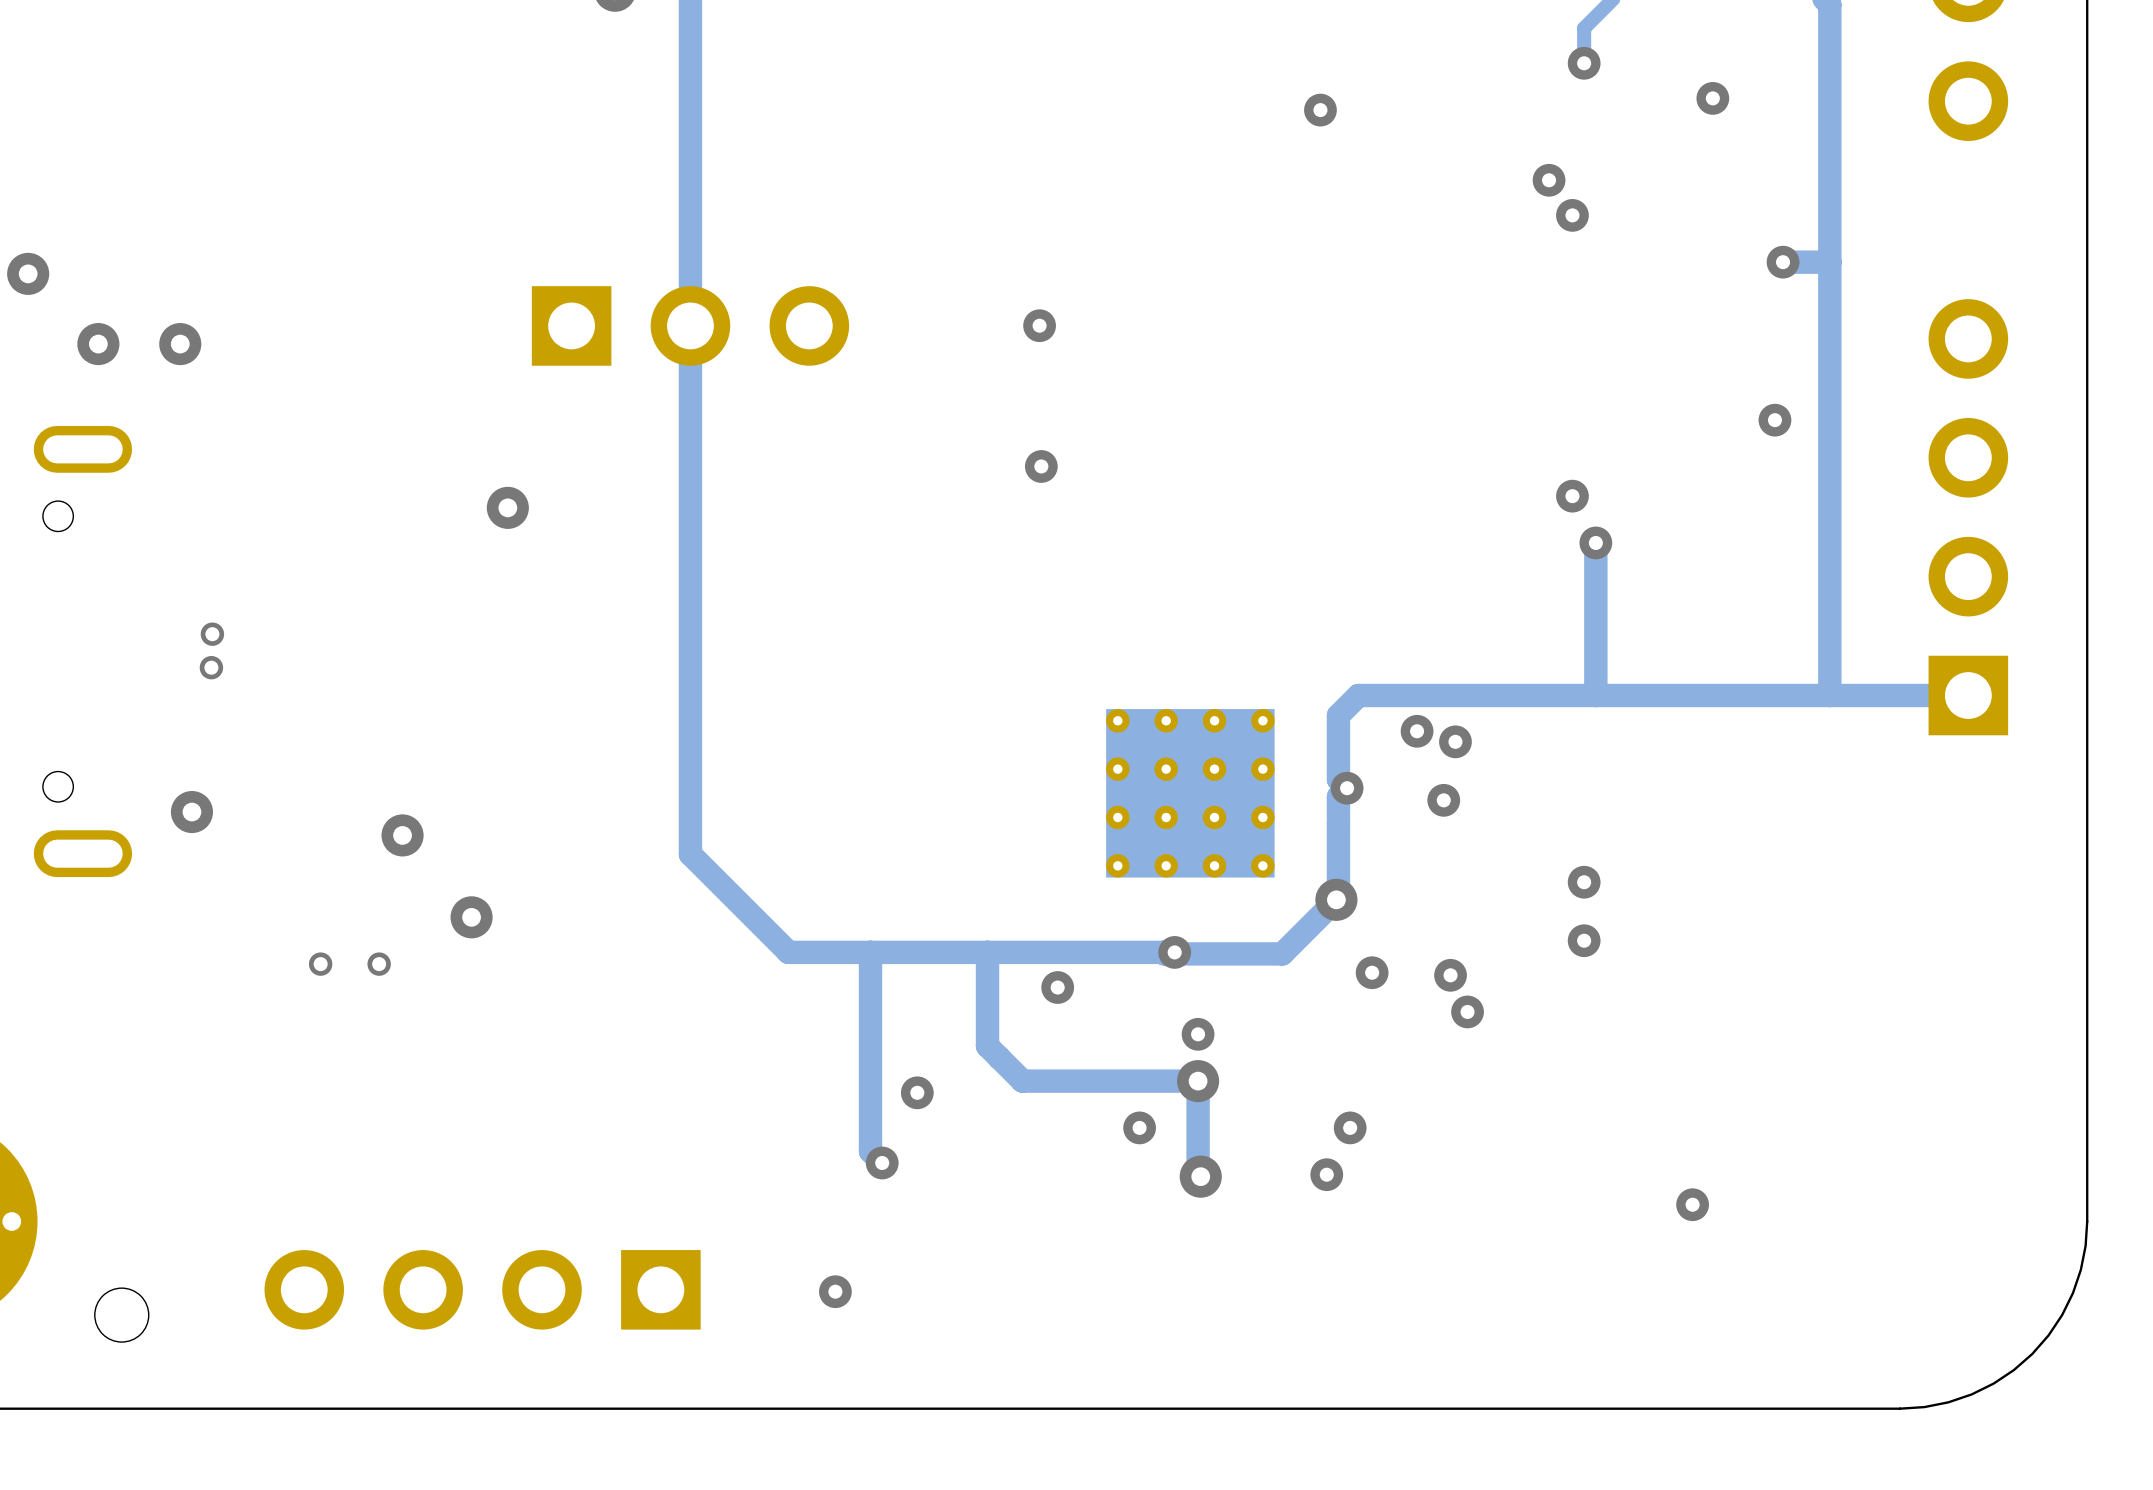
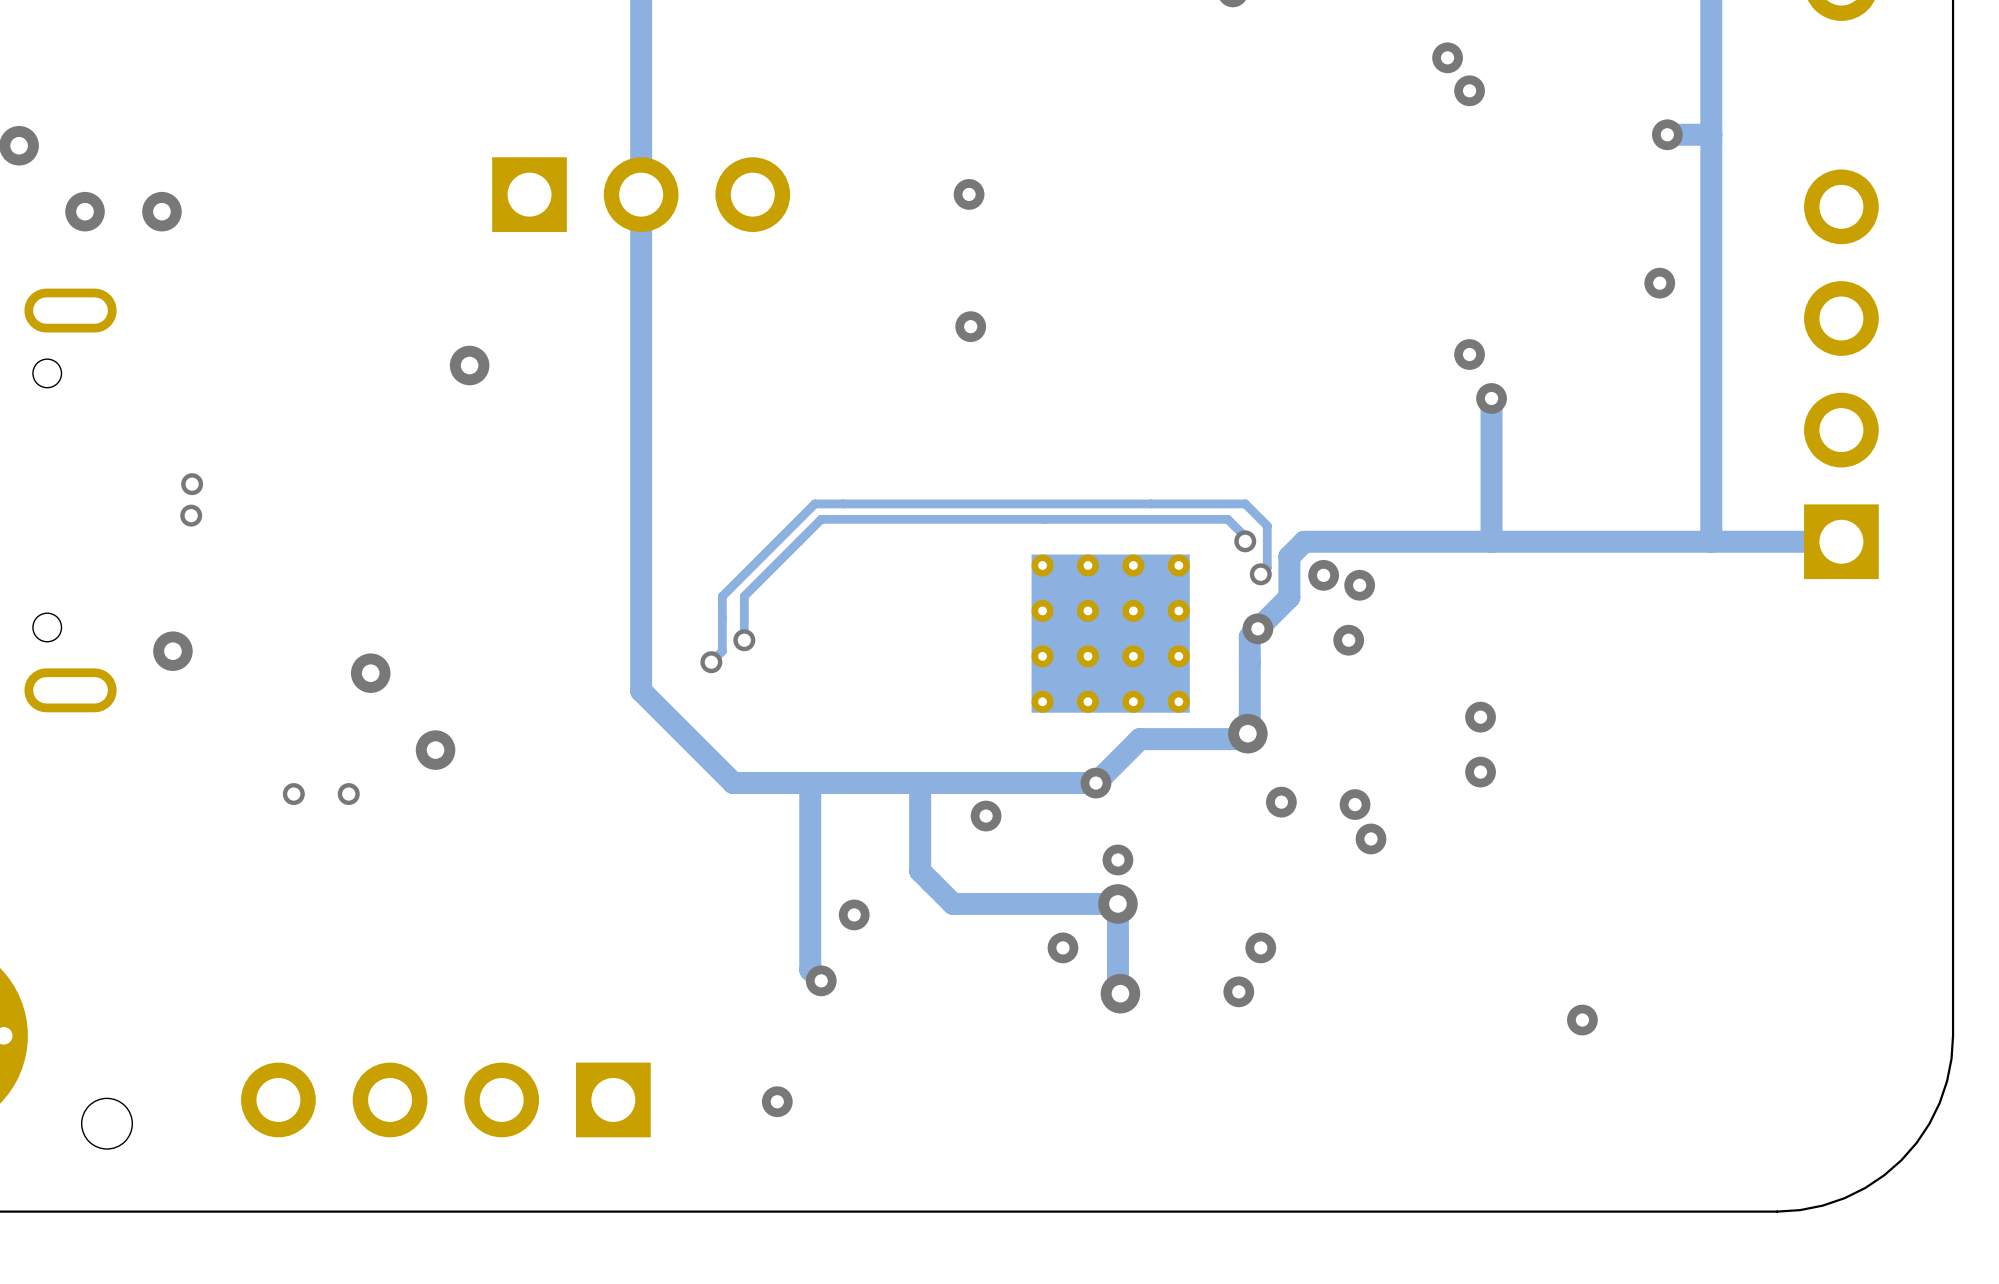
track: none -> (1245, 541) (1245, 536) (1227, 519) (821, 519) (744, 596) (744, 640)
via: none -> (1245, 541)
track: (1396, 695) (1358, 695) (1338, 715) (1338, 779) (1347, 788) -> (1304, 541) (1289, 556) (1289, 597) (1257, 628)
track: none -> (1260, 574) (1267, 567) (1267, 525) (1245, 503) (814, 503) (722, 596) (722, 651) (711, 662)
via: none -> (1260, 574)
via: none -> (744, 640)
via: none -> (711, 662)
track: (1330, 905) (1282, 953) (1164, 953) (1162, 952) -> (1242, 739) (1139, 739) (1095, 783)

